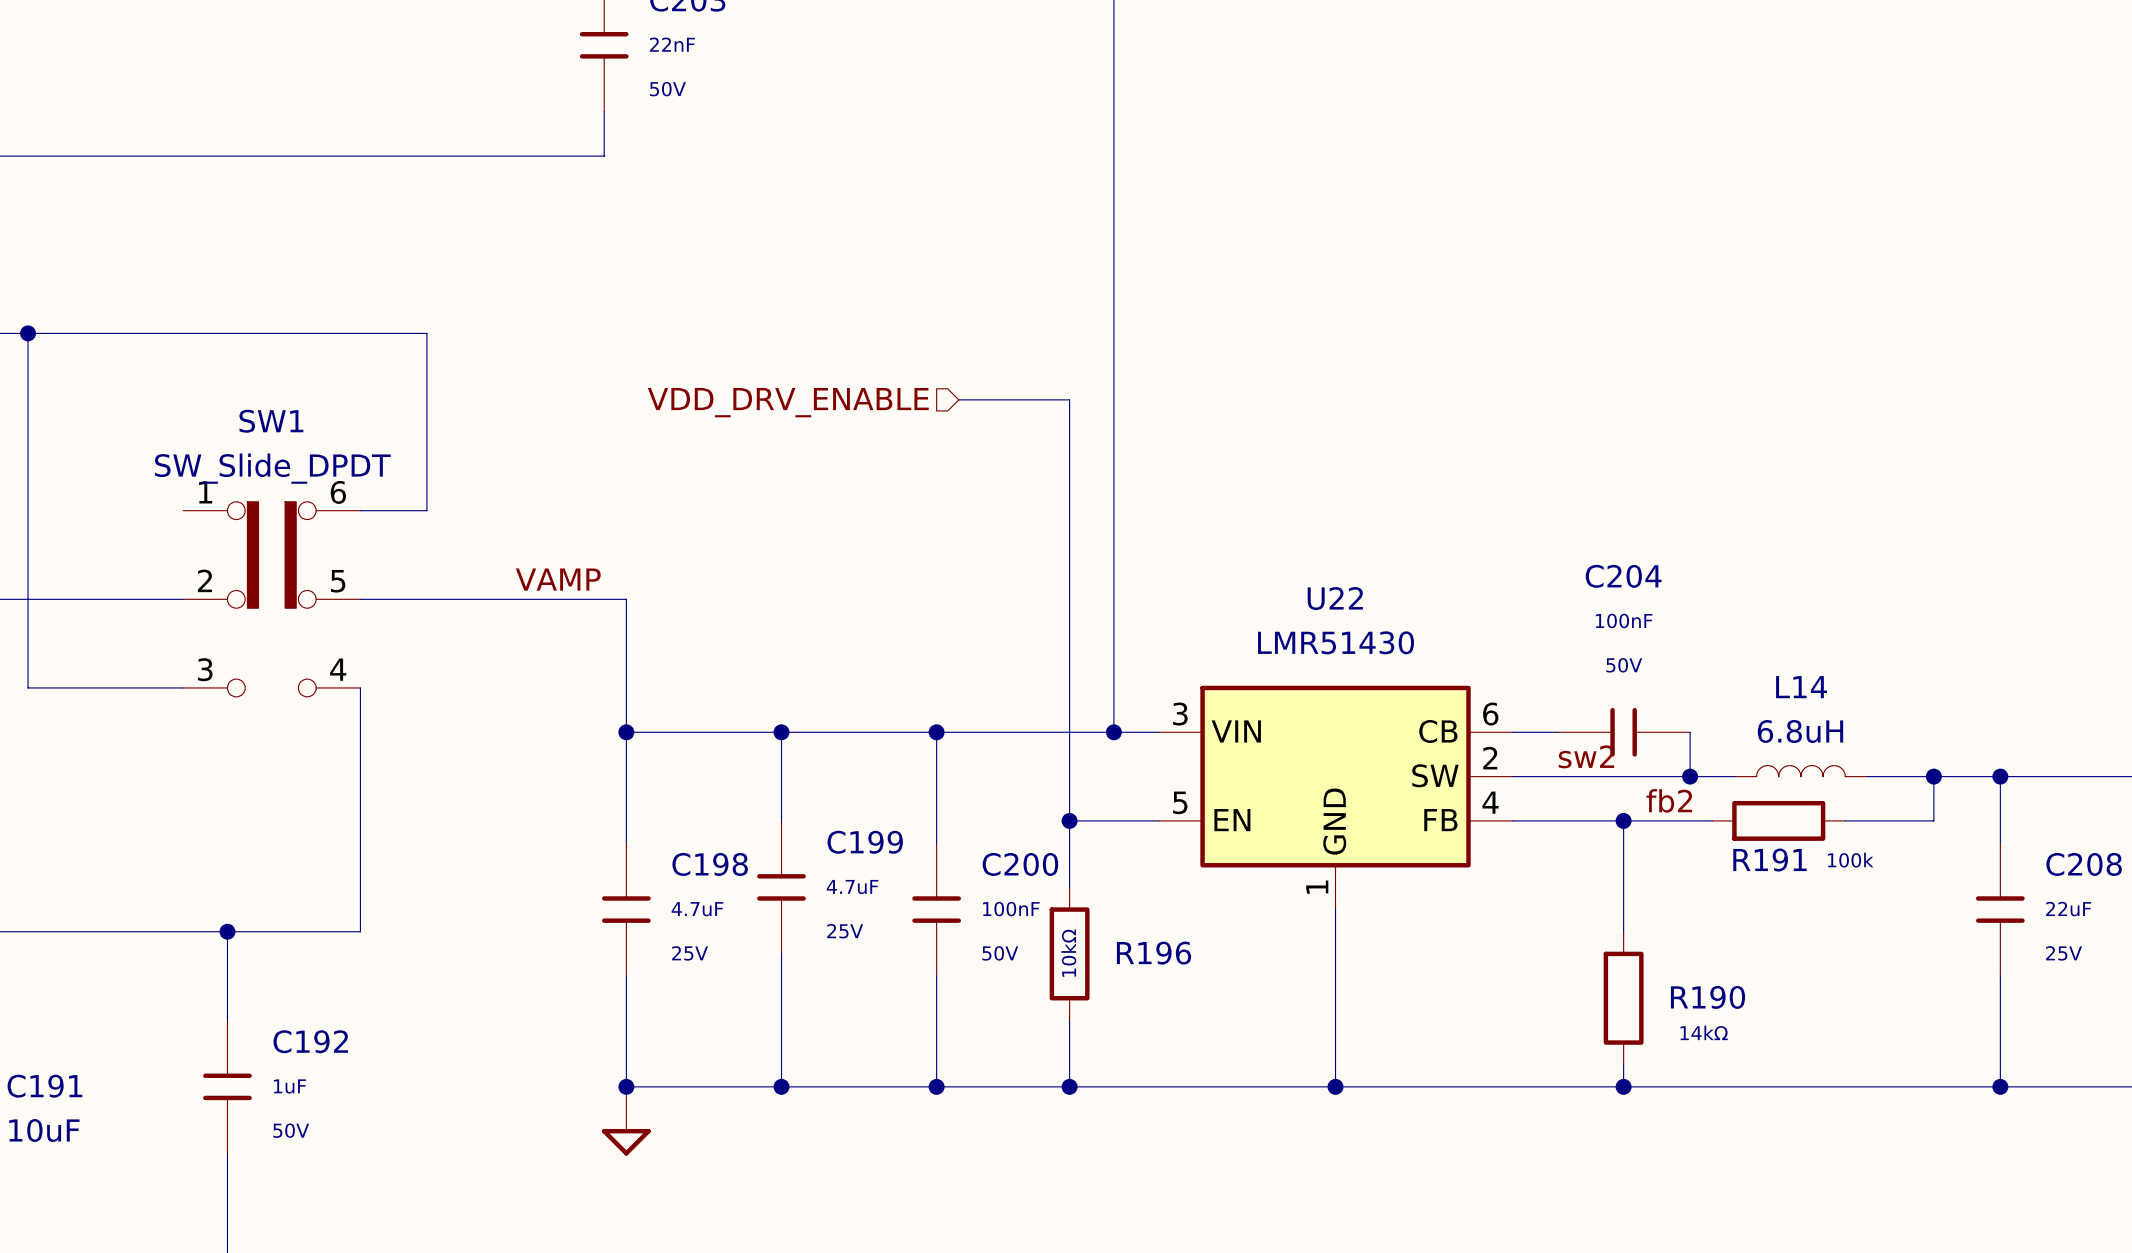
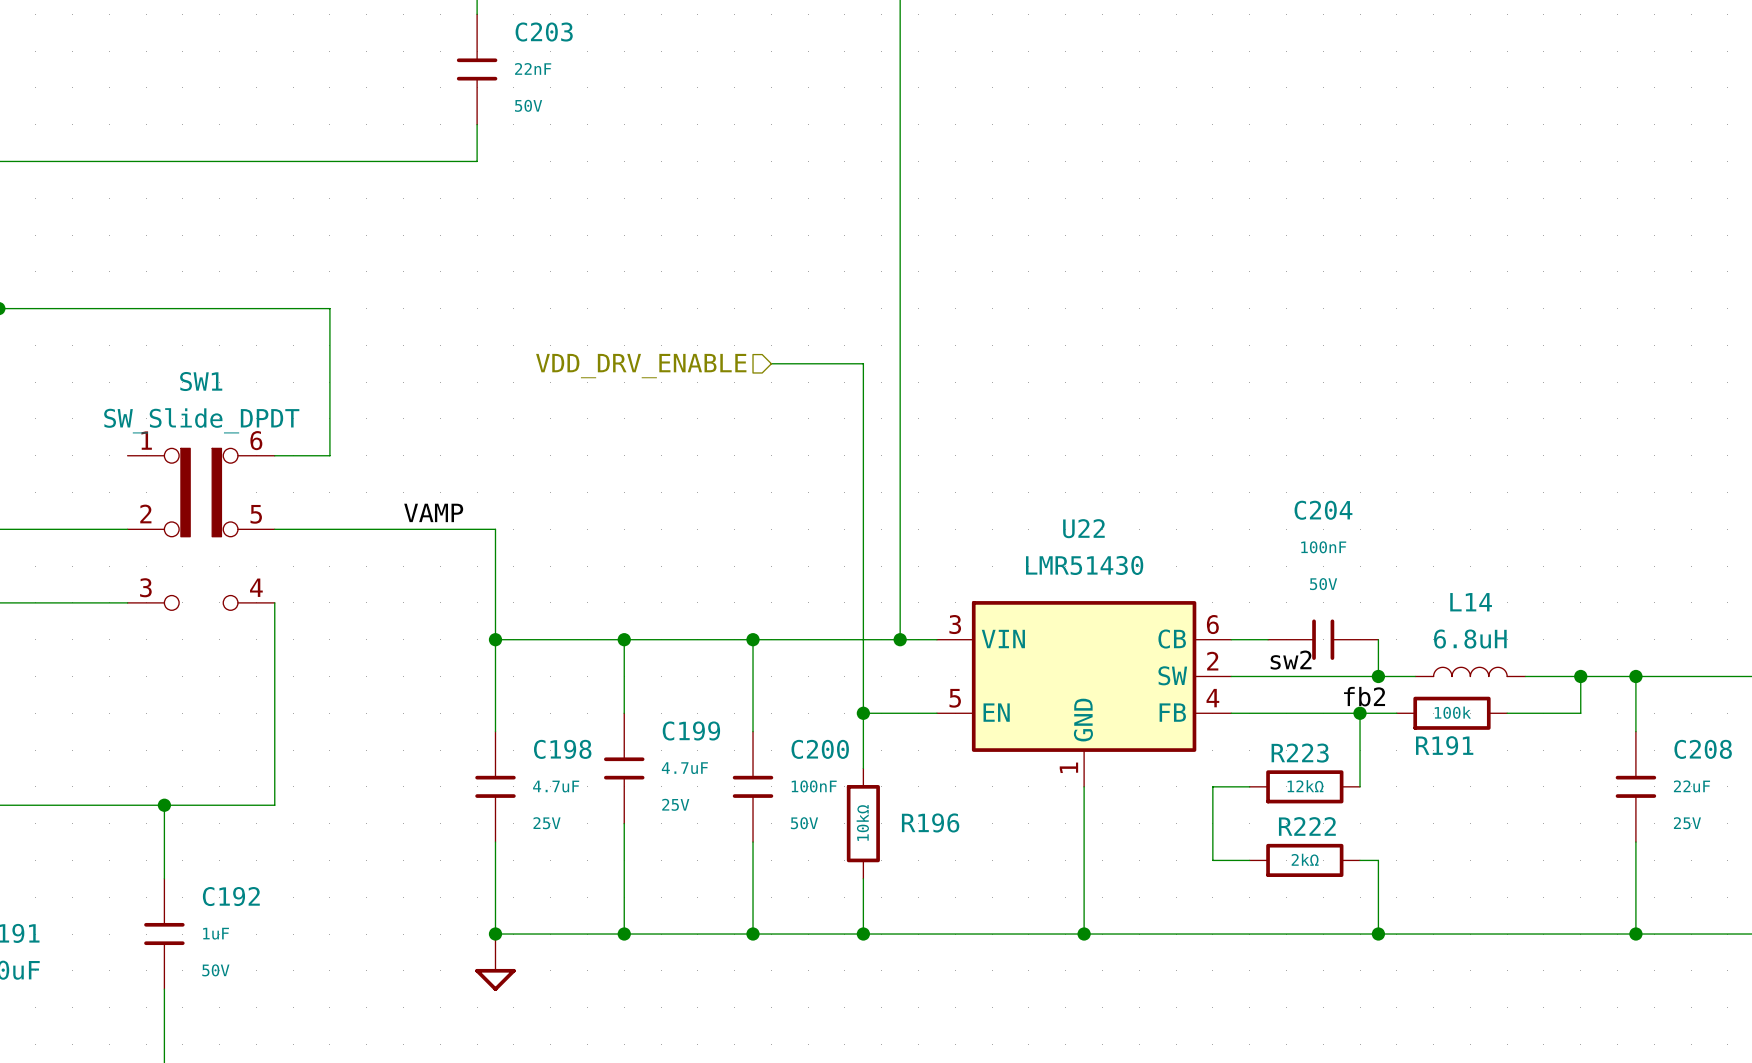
wire: (1623, 820) (1623, 931) -> none
junction position: (1623, 820) -> (1360, 713)
wire: none -> (1360, 713) (1360, 786)
R191 value position: 100k (1850, 860) -> 100k (1452, 712)
wire: none -> (1249, 786) (1212, 786) (1212, 860) (1249, 860)
R223: none -> 12kΩ (1304, 786)
R222: none -> 2kΩ (1304, 860)
R190: 14kΩ (1623, 998) -> none
wire: none -> (1360, 860) (1378, 860) (1378, 934)
wire: (1623, 1064) (1623, 1086) -> none
junction position: (1623, 1086) -> (1378, 934)

